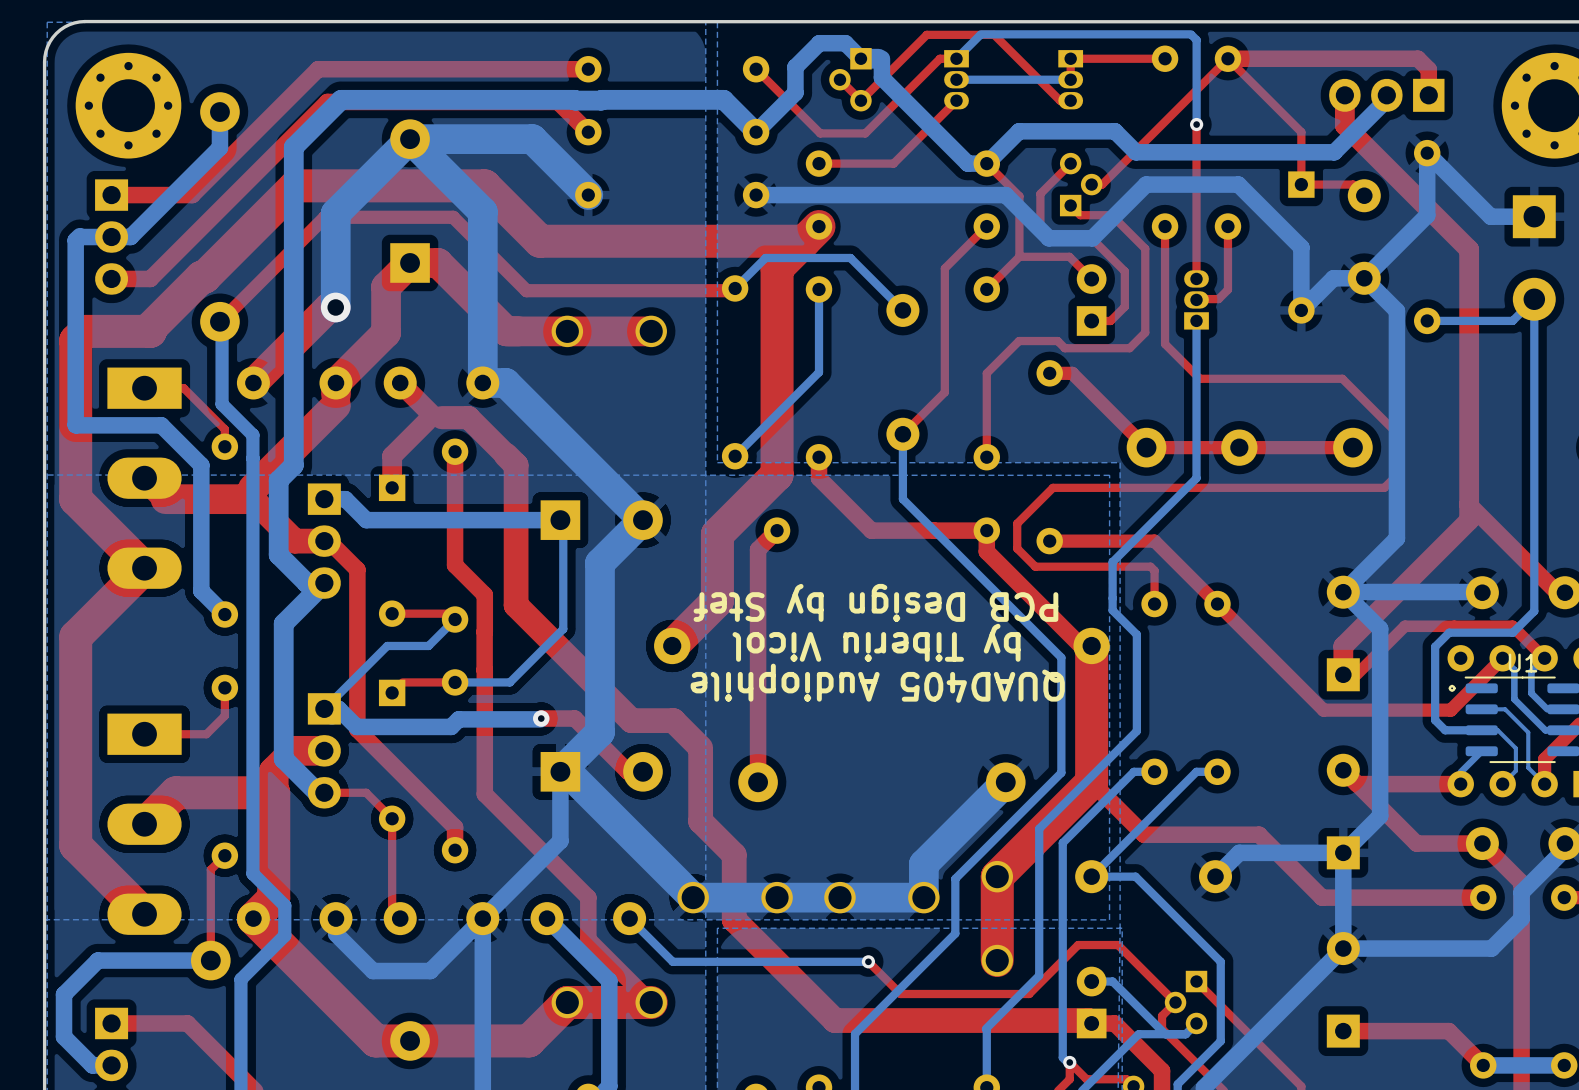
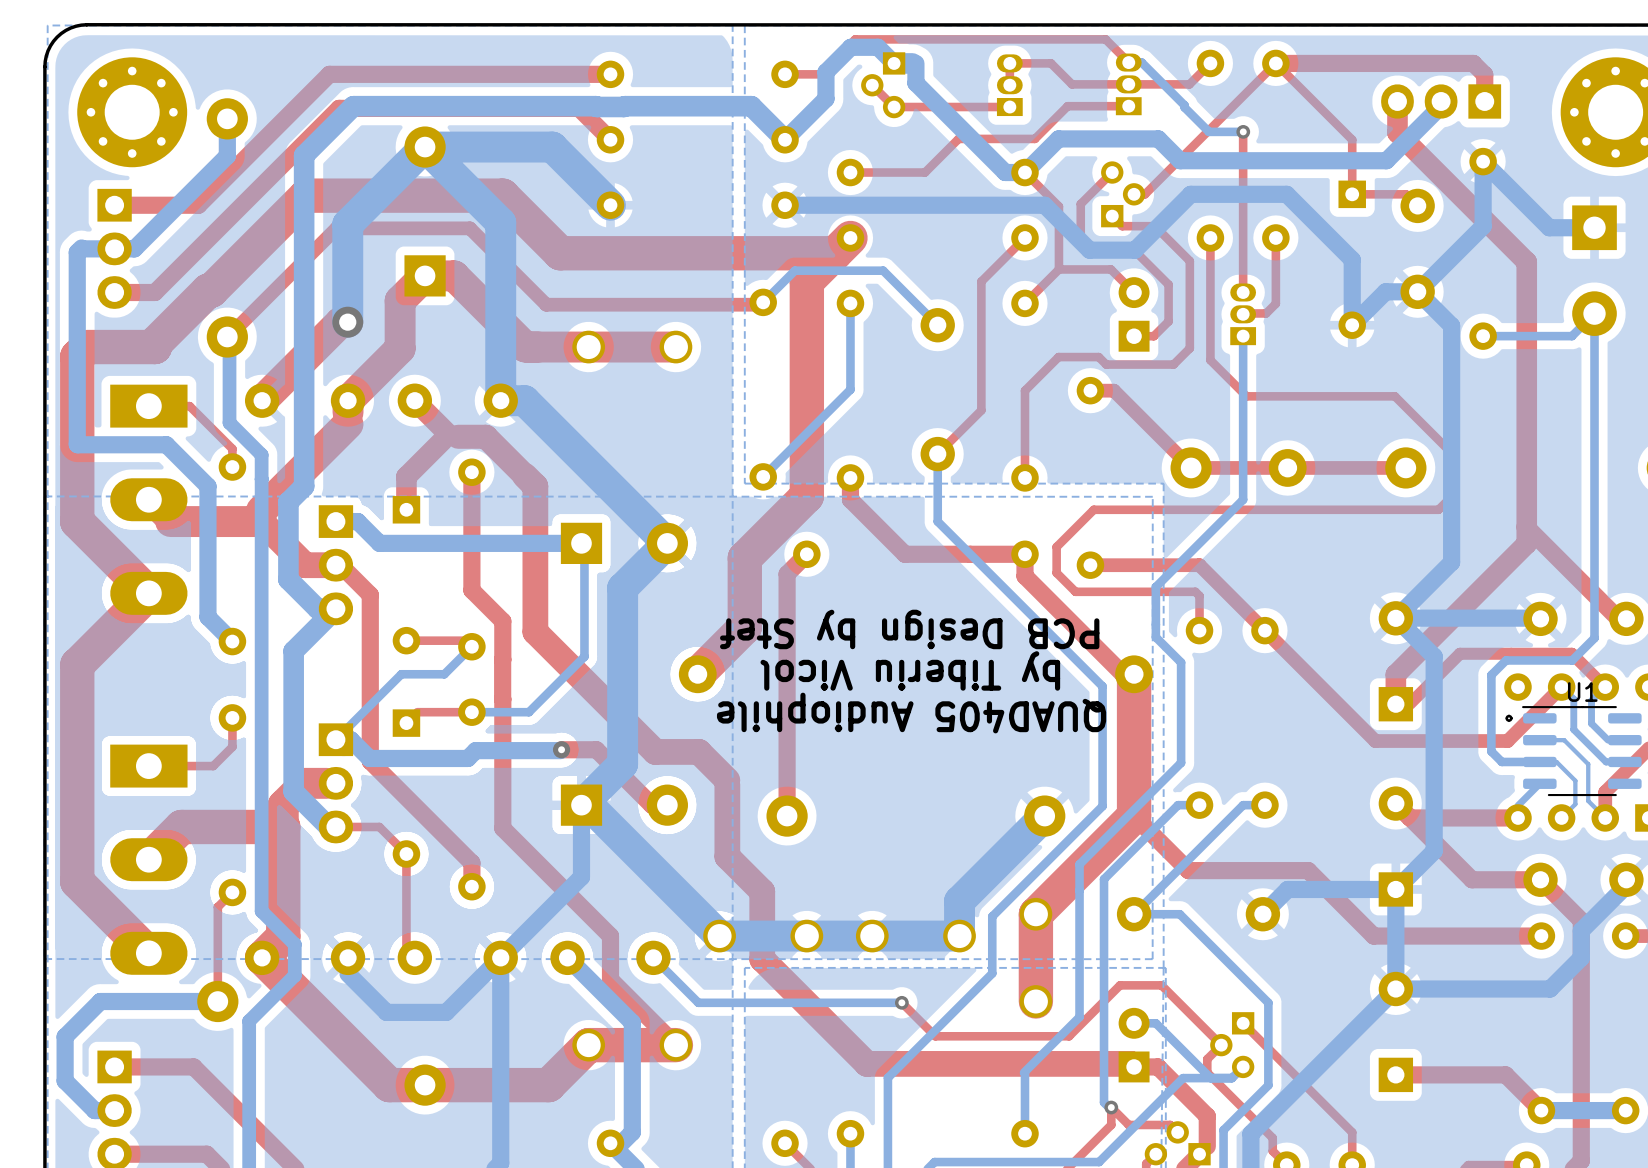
bottom track: (956, 58) (980, 34) (1190, 34) (1196, 40) (1196, 124) -> (1128, 62) (1141, 62) (1208, 131) (1243, 131)
top track: (956, 58) (940, 58) (865, 133) (820, 133) (756, 69) -> (1128, 62) (1105, 39) (855, 39) (820, 74) (785, 74)
top track: (1165, 58) (1070, 58) (1070, 79) -> (1210, 63) (1189, 84) (1072, 84) (1051, 63) (1009, 63) (1009, 85)
part rotation: 0° (956, 79) -> 180° (1009, 85)
bottom track: (1070, 79) (956, 79) -> none
part rotation: 0° (1070, 79) -> 180° (1128, 84)
top track: (956, 100) (893, 163) (890, 163) -> (1128, 106) (1067, 106) (1034, 138) (958, 138) (924, 172)
top track: (1070, 100) (1060, 100) (994, 34) (926, 34) (860, 100) -> (1009, 107) (894, 107)

